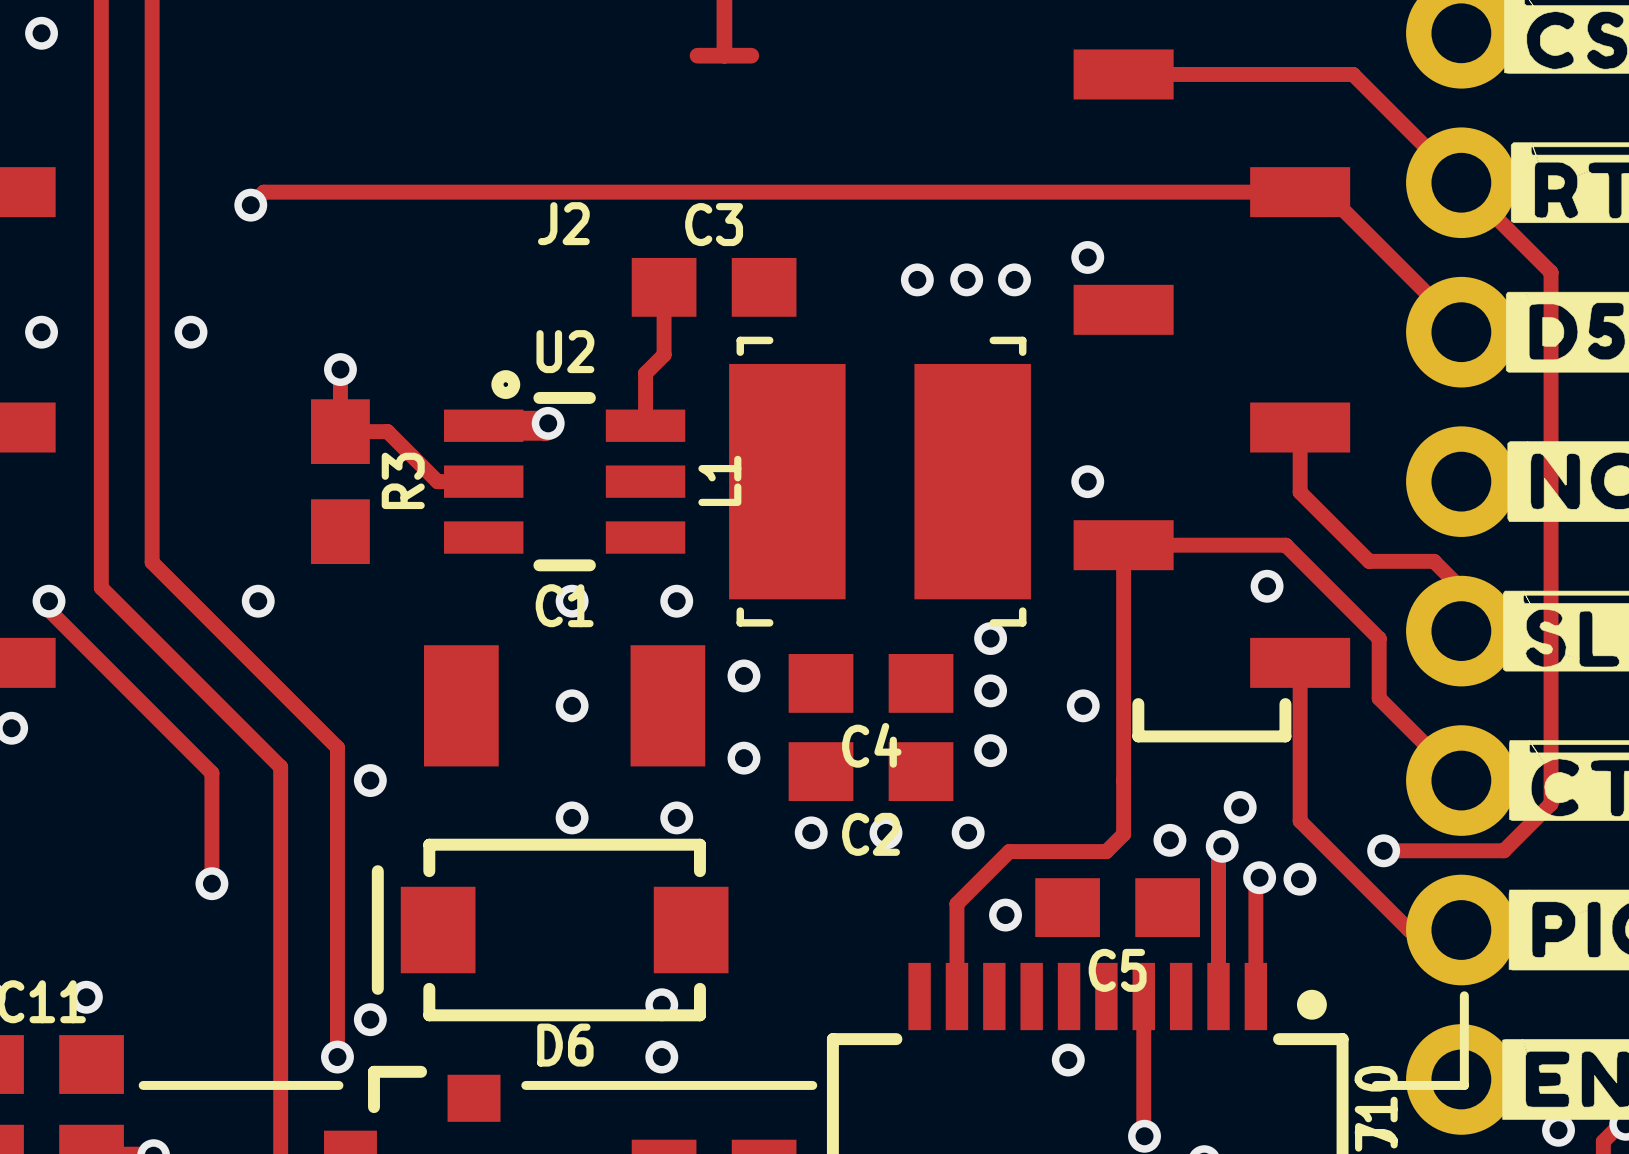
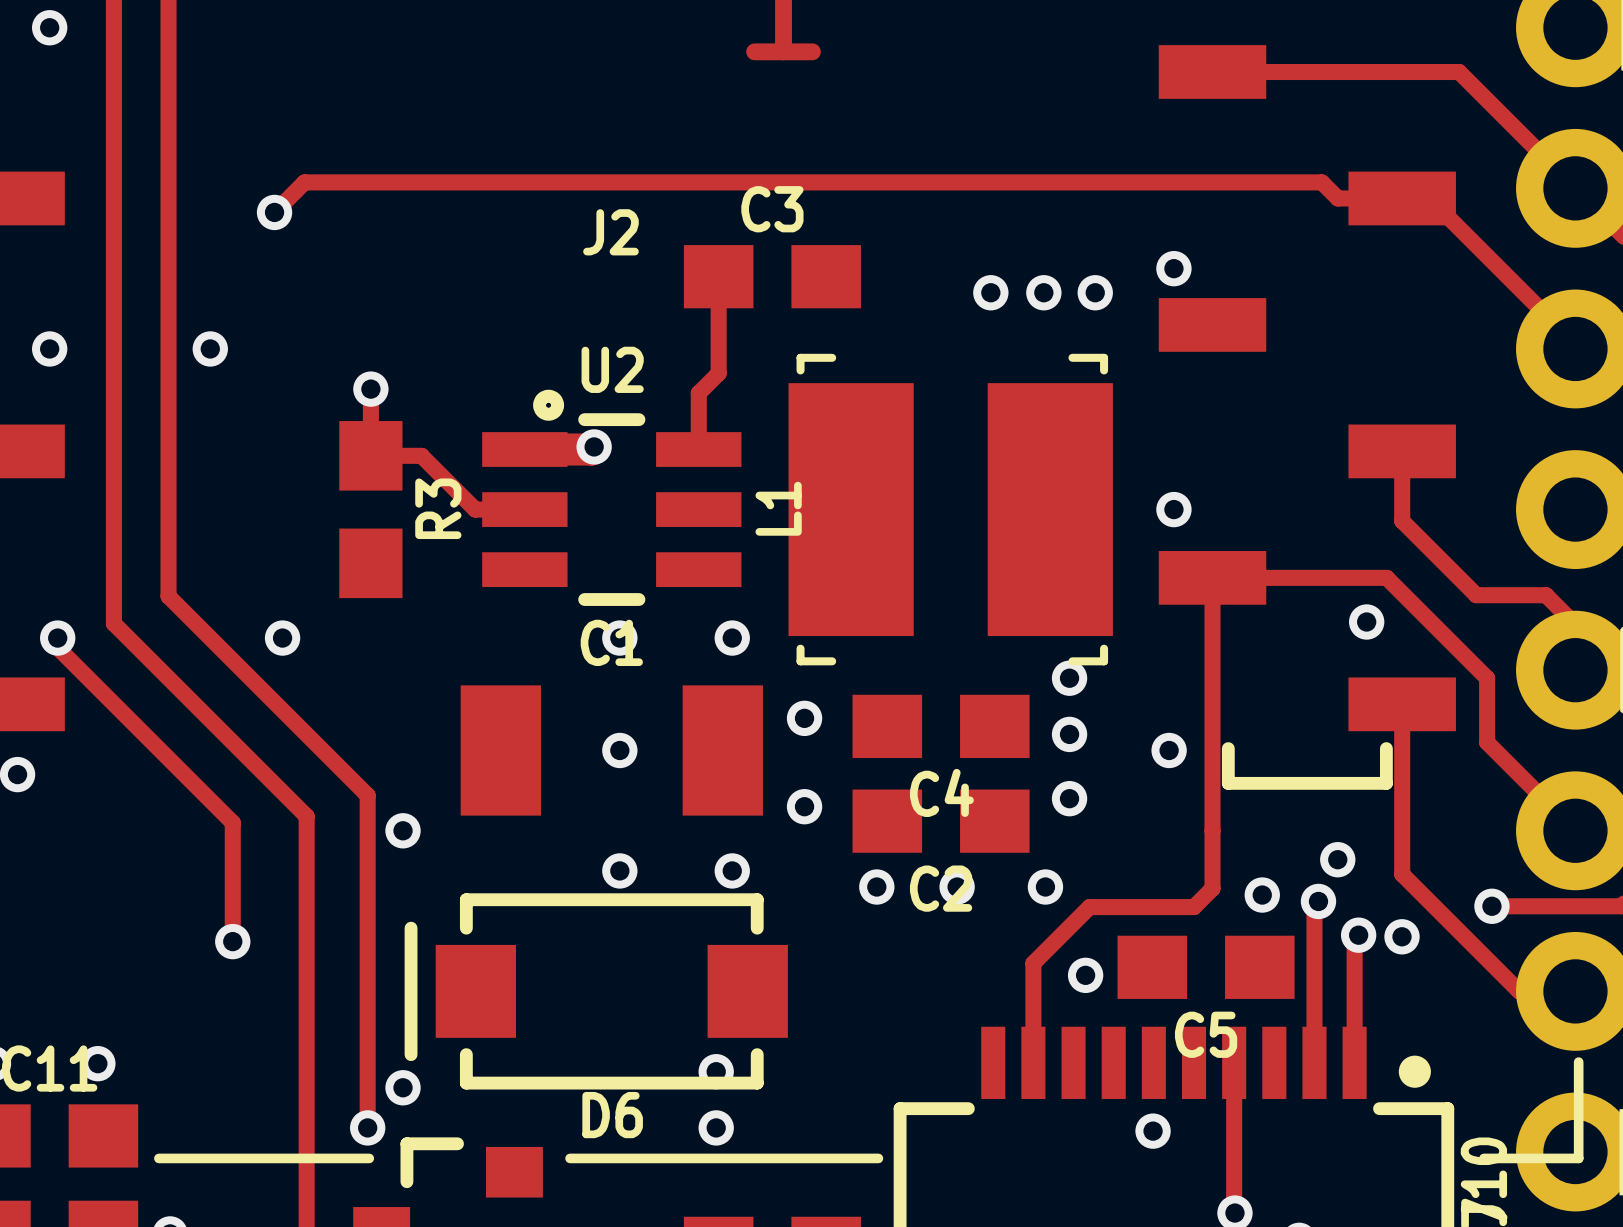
track: (263, 192) (1240, 192) -> (288, 198) (304, 182) (1321, 182) (1337, 198)
C3 position: (714, 287) -> (772, 276)

